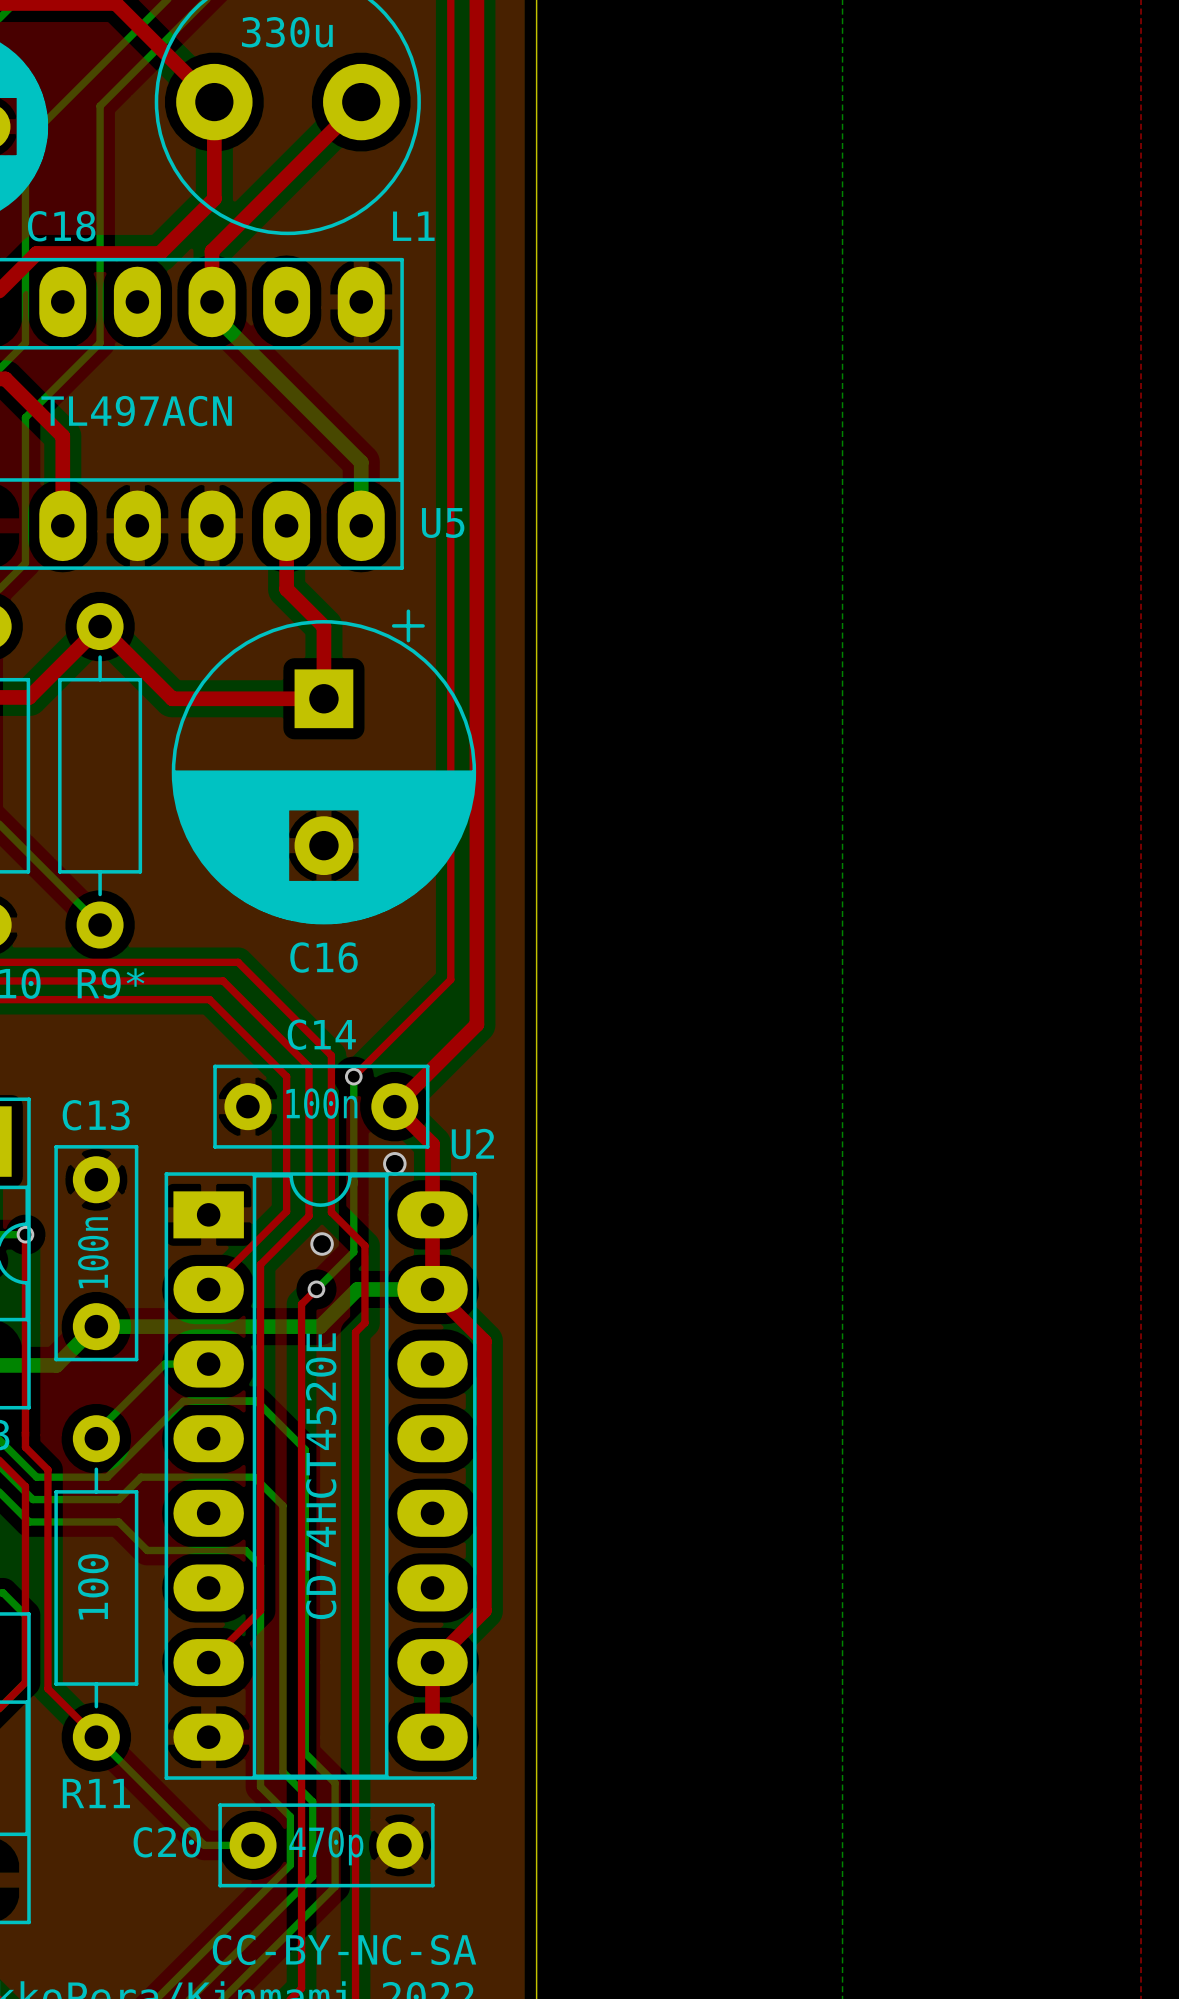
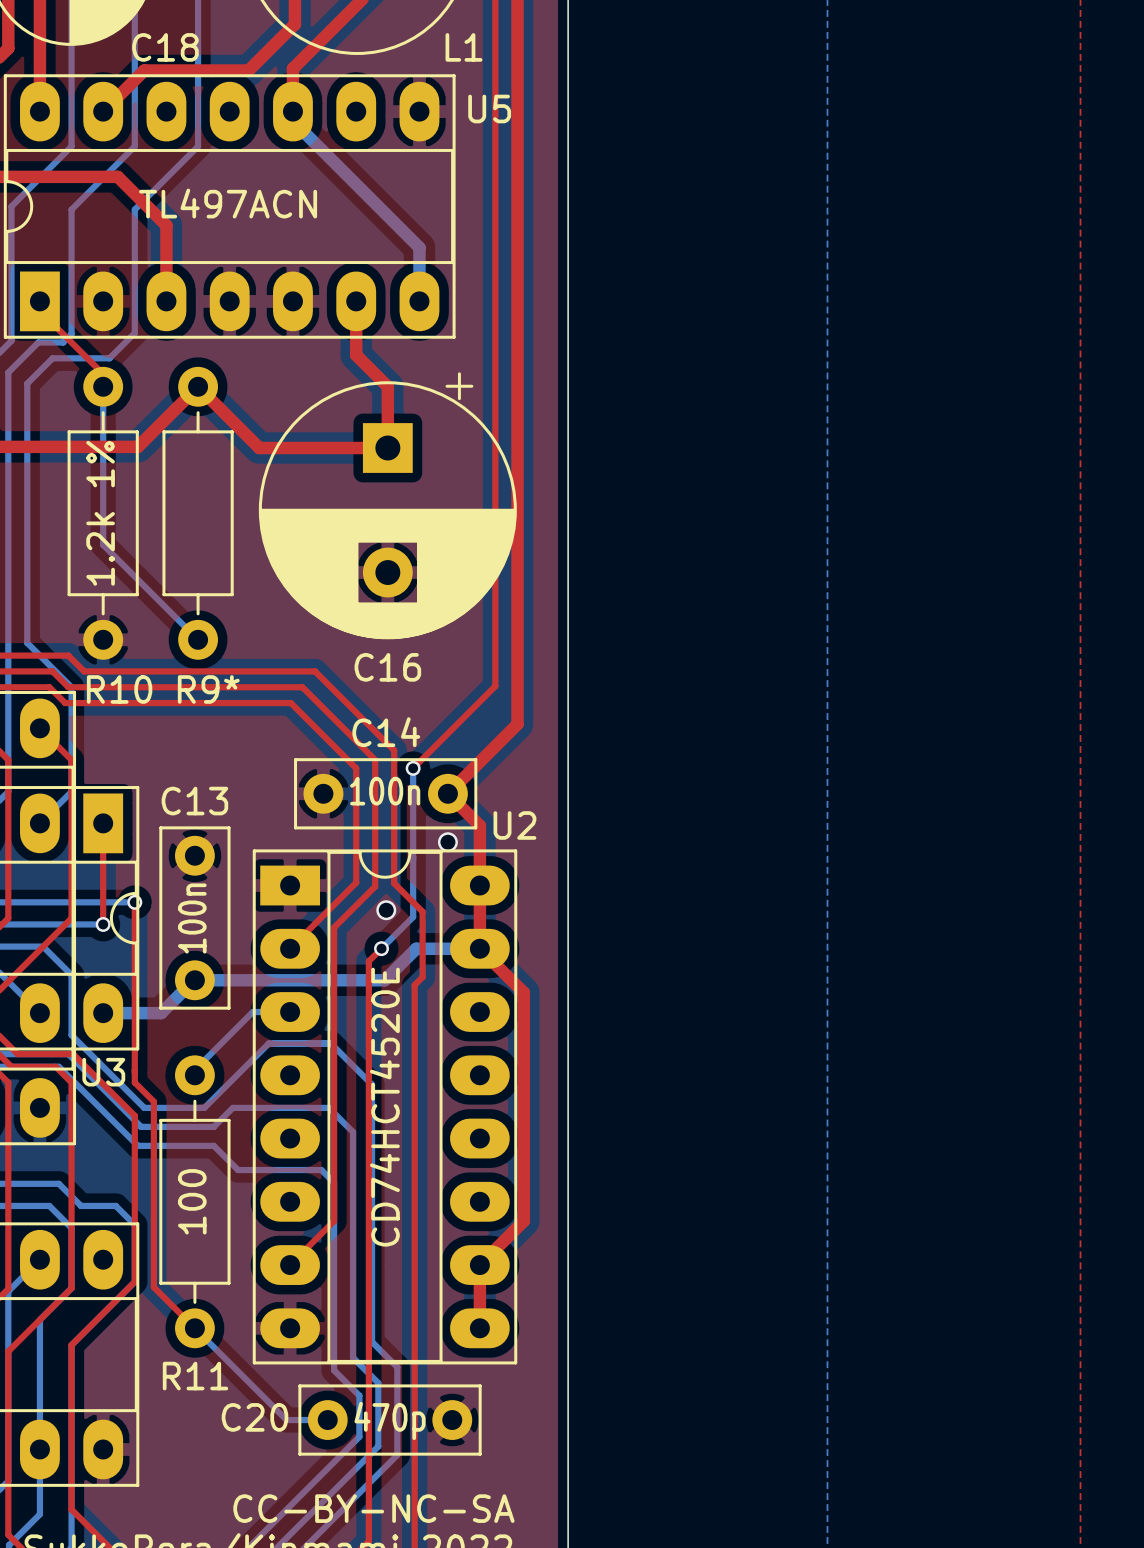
U5 name position: U5 (443, 523) -> U5 (489, 109)

